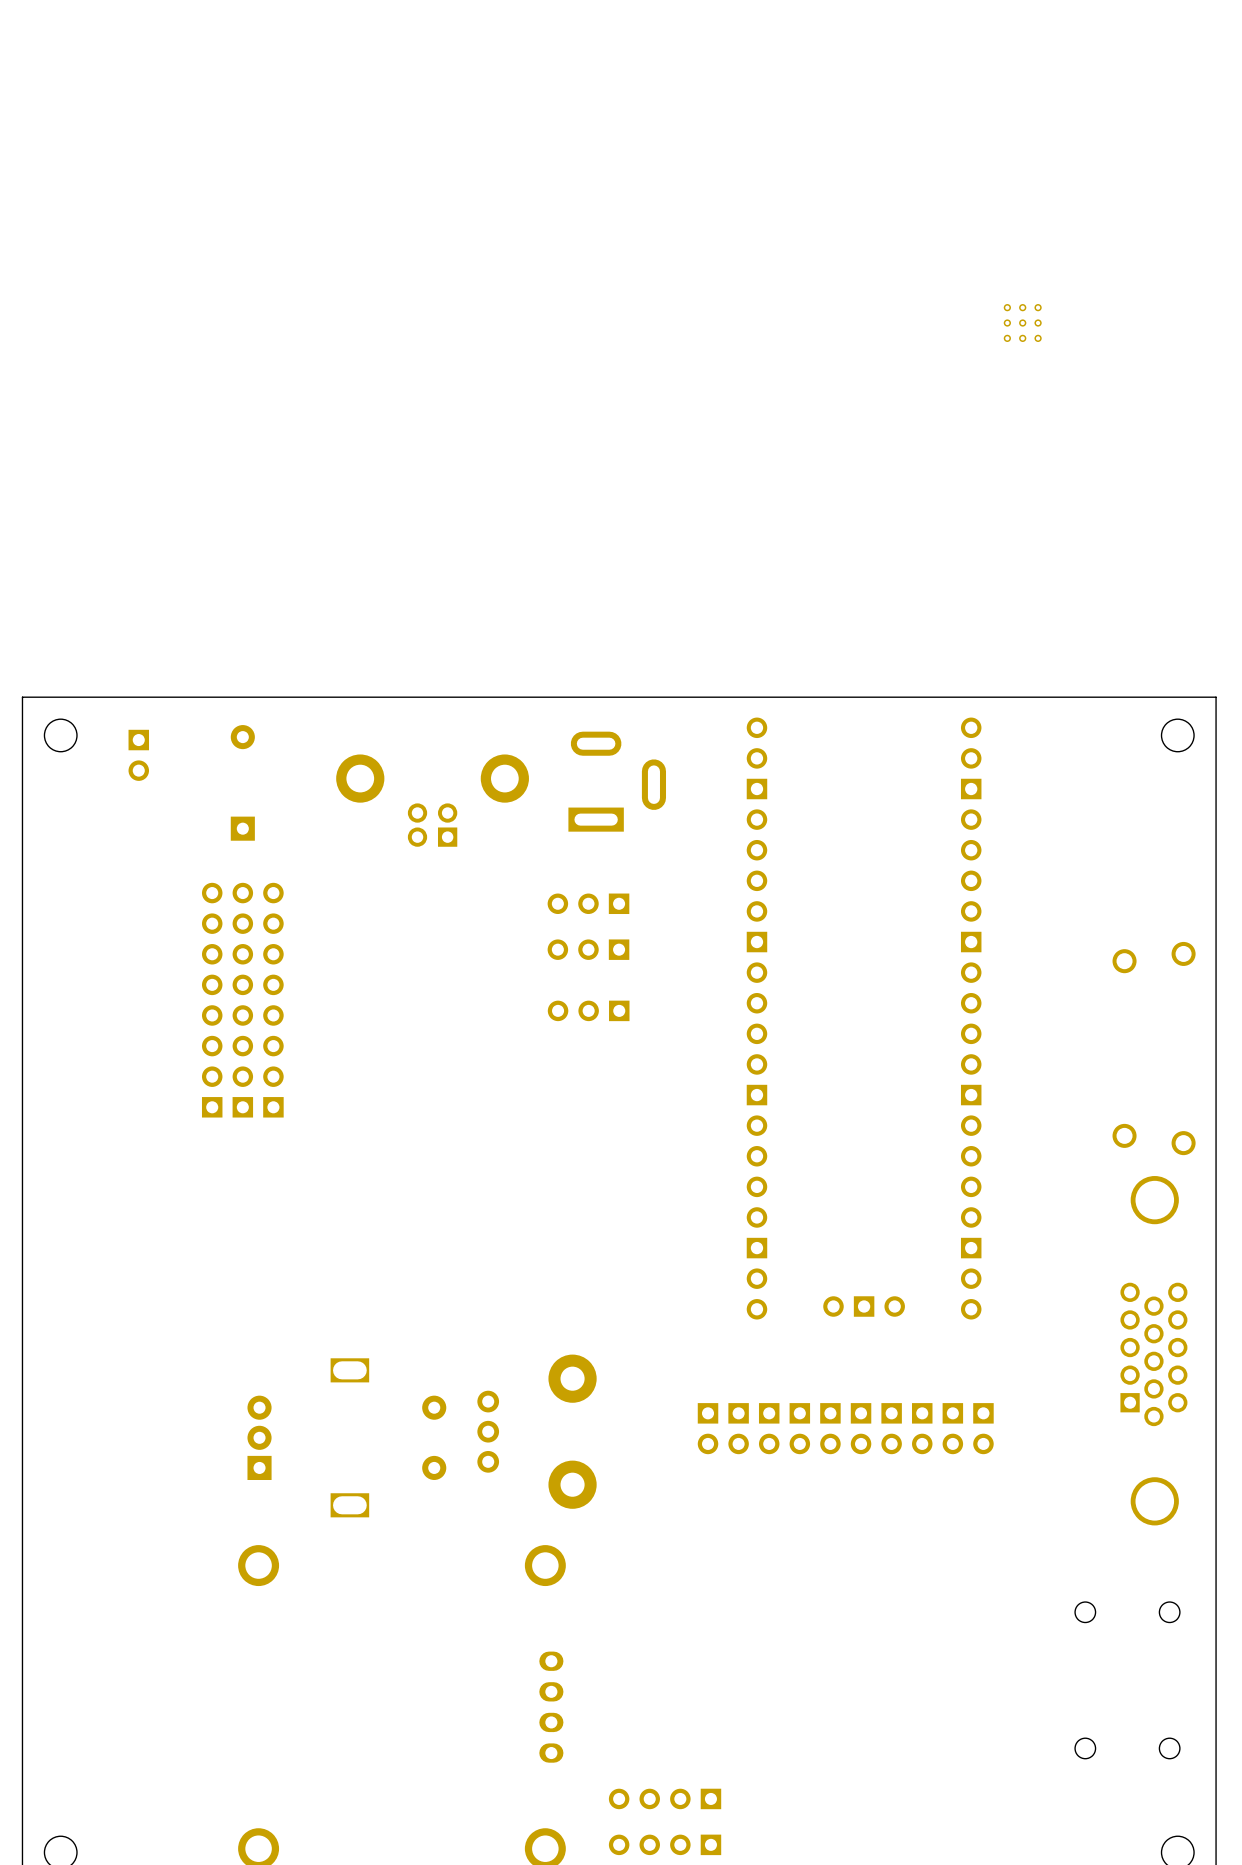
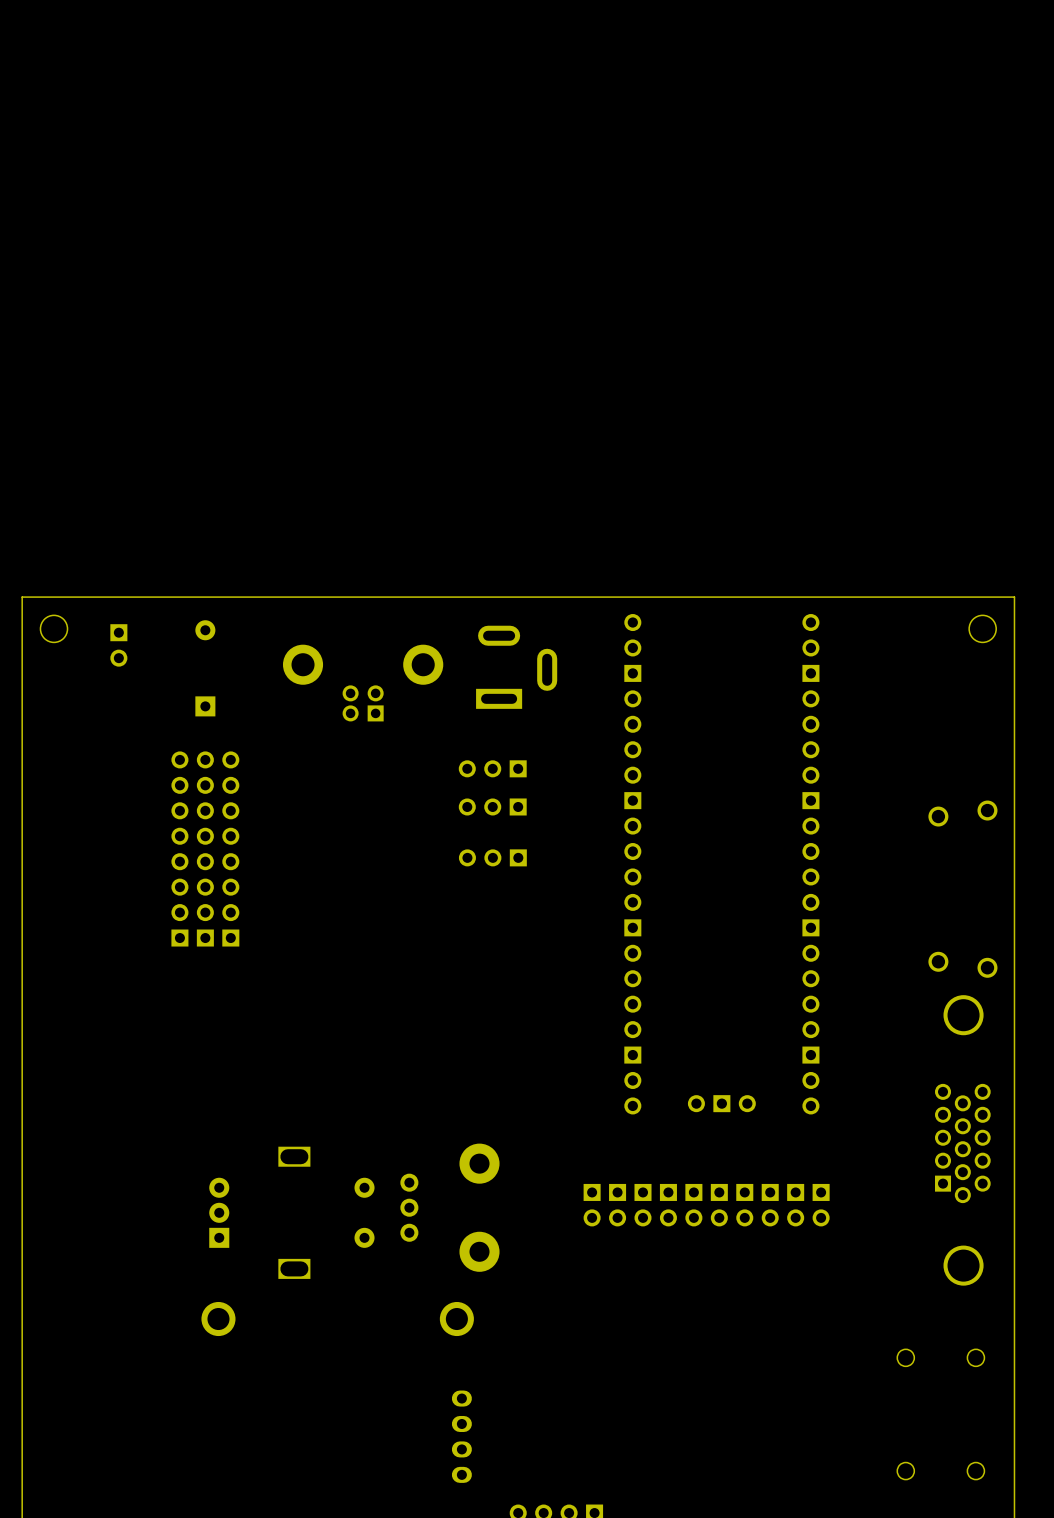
part: (1022, 323) -> none

